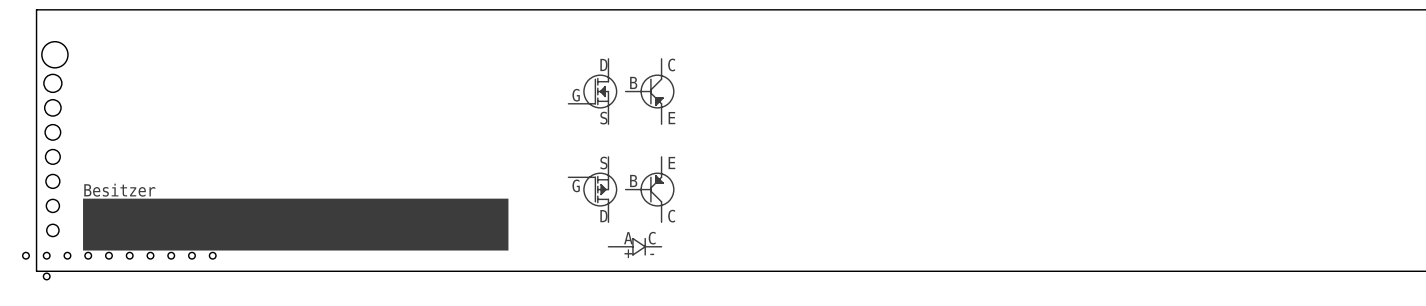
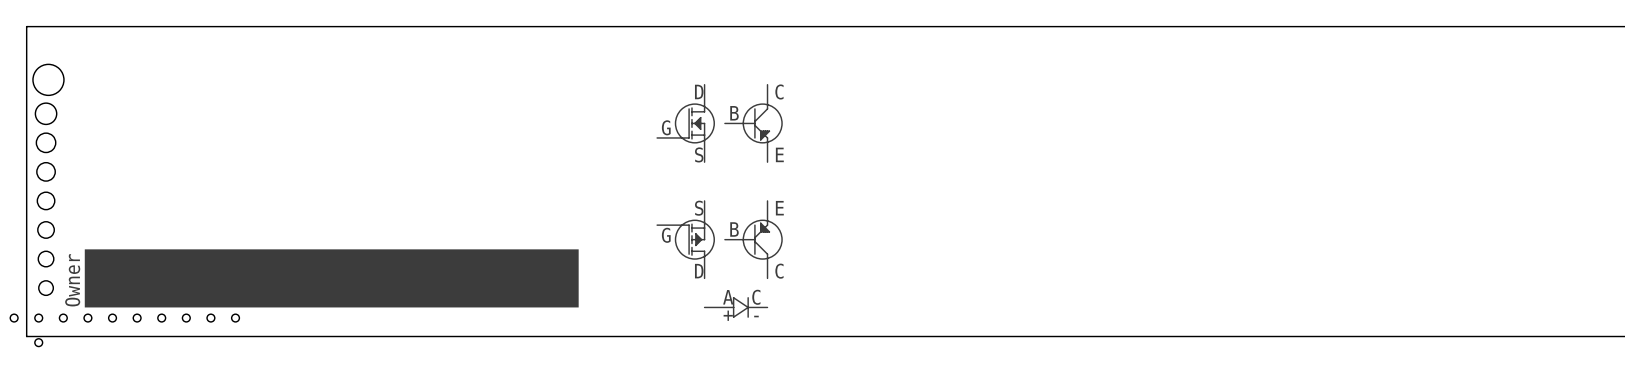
text: Besitzer (119, 190) -> none
drawing shape: [83, 198, 509, 251] -> [84, 249, 579, 308]
text: none -> Owner (72, 280)

